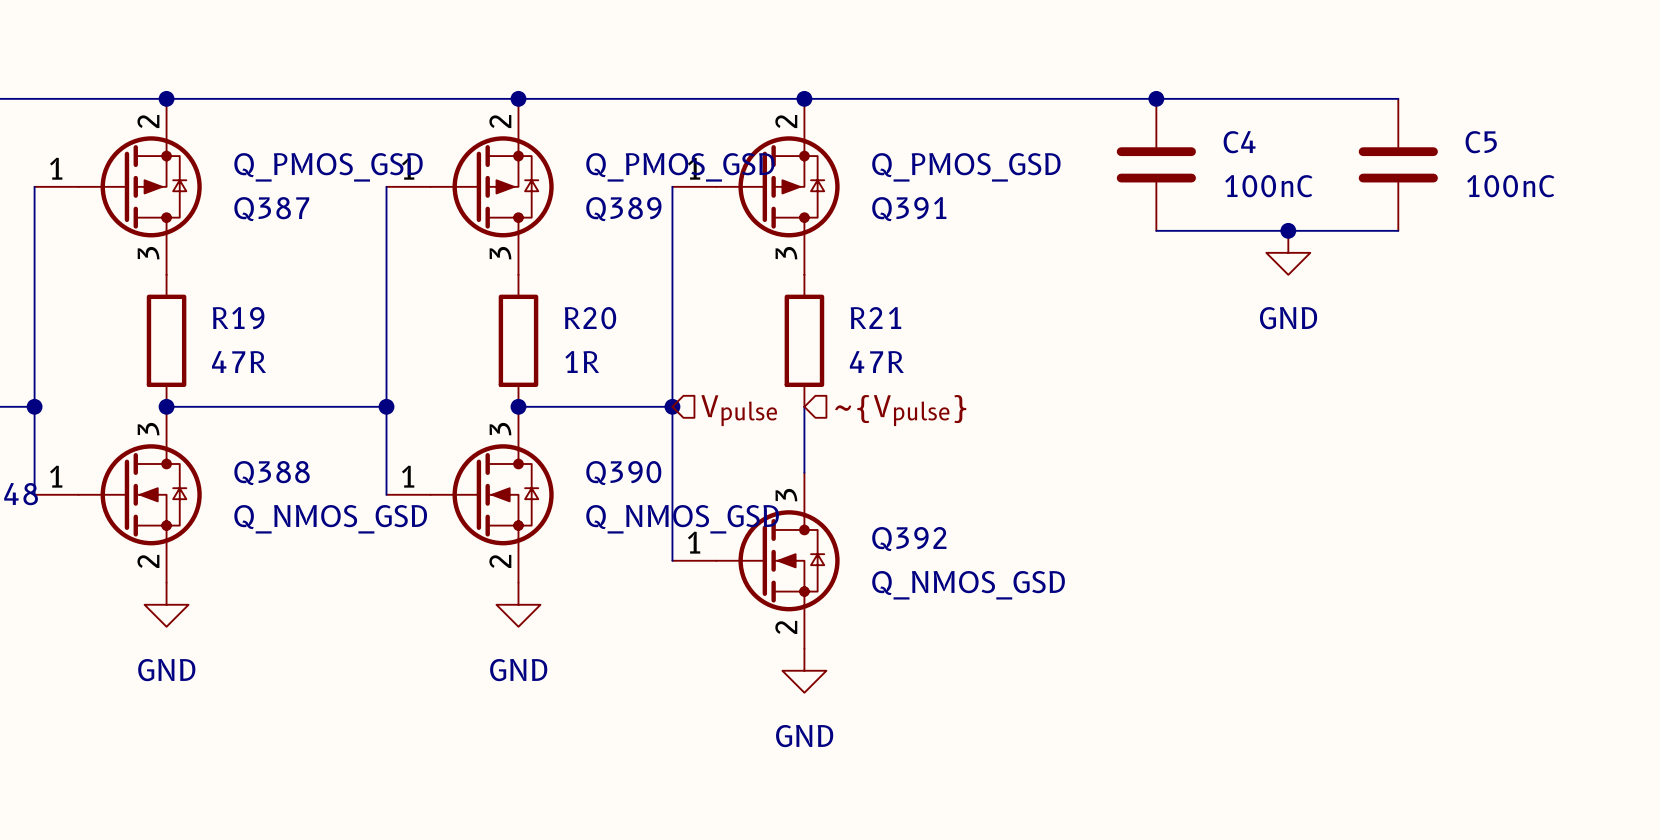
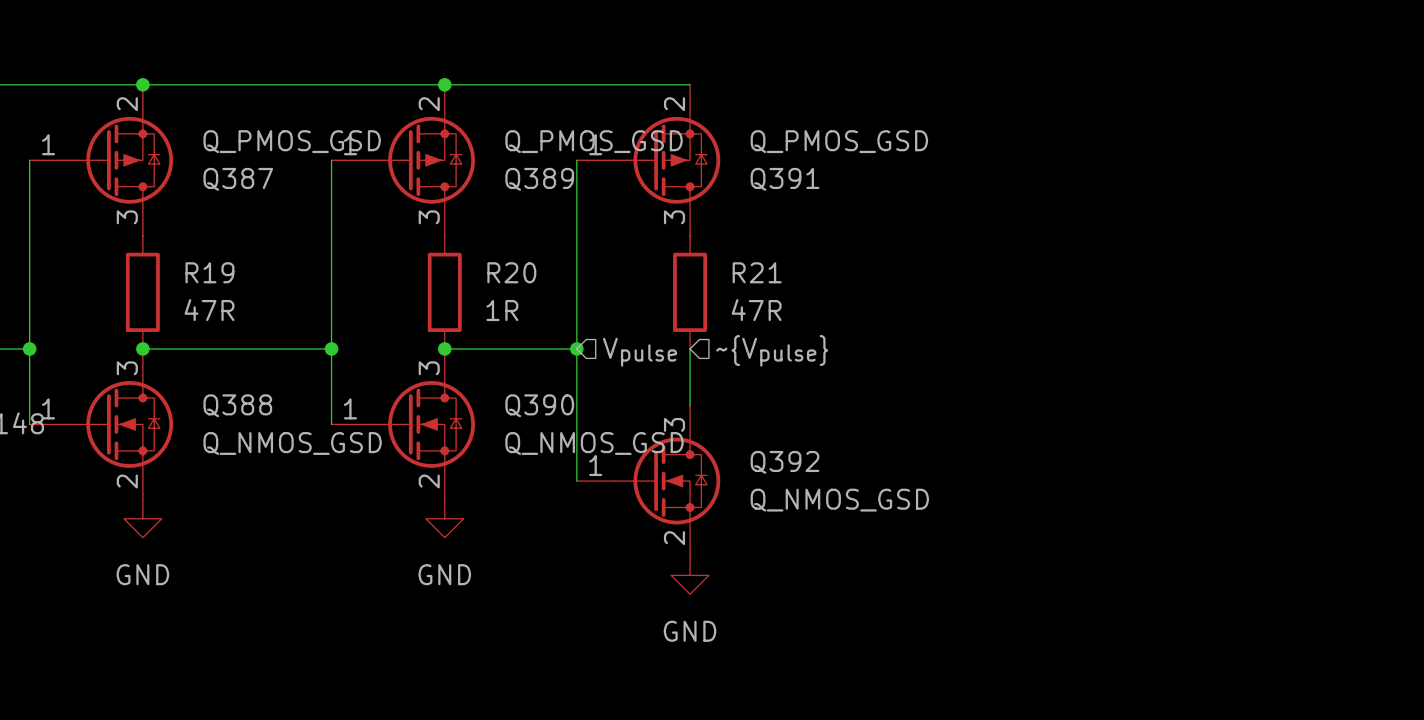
wire: (804, 98) (1398, 98) -> none
junction: (804, 98) -> none
junction: (1156, 98) -> none
C4: 100nC (1156, 164) -> none
C5: 100nC (1398, 164) -> none
wire: (1156, 230) (1398, 230) -> none
junction: (1288, 230) -> none
power symbol: GND (1288, 252) -> none

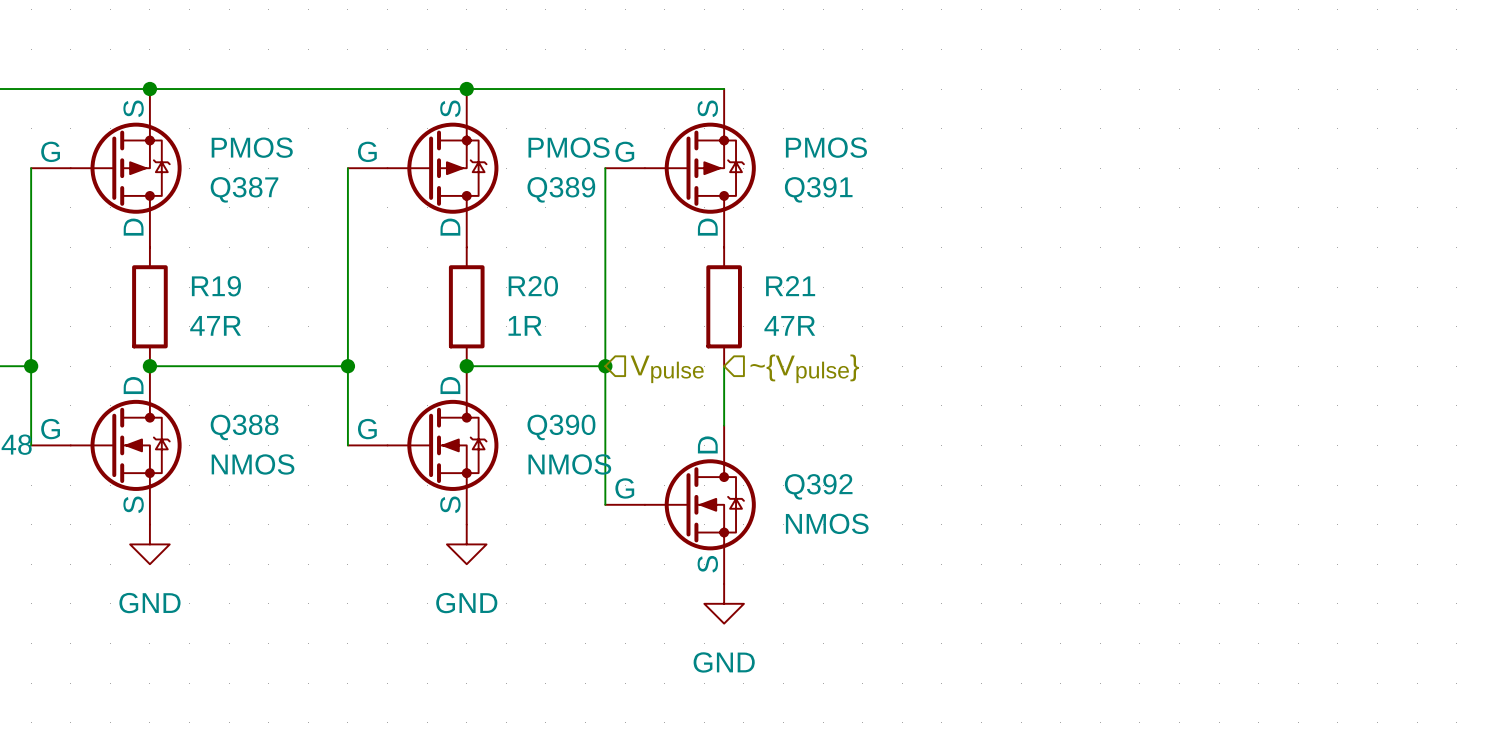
Q387 symbol: [29, 84, 174, 236] -> [31, 89, 182, 248]
Q389 symbol: [331, 84, 475, 236] -> [347, 89, 499, 248]
Q391 symbol: [576, 84, 721, 236] -> [605, 89, 756, 248]
Q387 value: Q_PMOS_GSD (292, 141) -> PMOS (252, 147)
Q389 value: Q_PMOS_GSD (594, 141) -> PMOS (569, 147)
Q391 value: Q_PMOS_GSD (839, 141) -> PMOS (826, 147)
Q388 symbol: [29, 348, 174, 500] -> [31, 366, 182, 525]
Q390 symbol: [331, 348, 475, 500] -> [347, 366, 499, 525]
Q392 symbol: [576, 405, 721, 557] -> [605, 425, 756, 585]
Q388 value: Q_NMOS_GSD (292, 443) -> NMOS (253, 464)
Q390 value: Q_NMOS_GSD (594, 443) -> NMOS (569, 464)
Q392 value: Q_NMOS_GSD (839, 500) -> NMOS (827, 523)

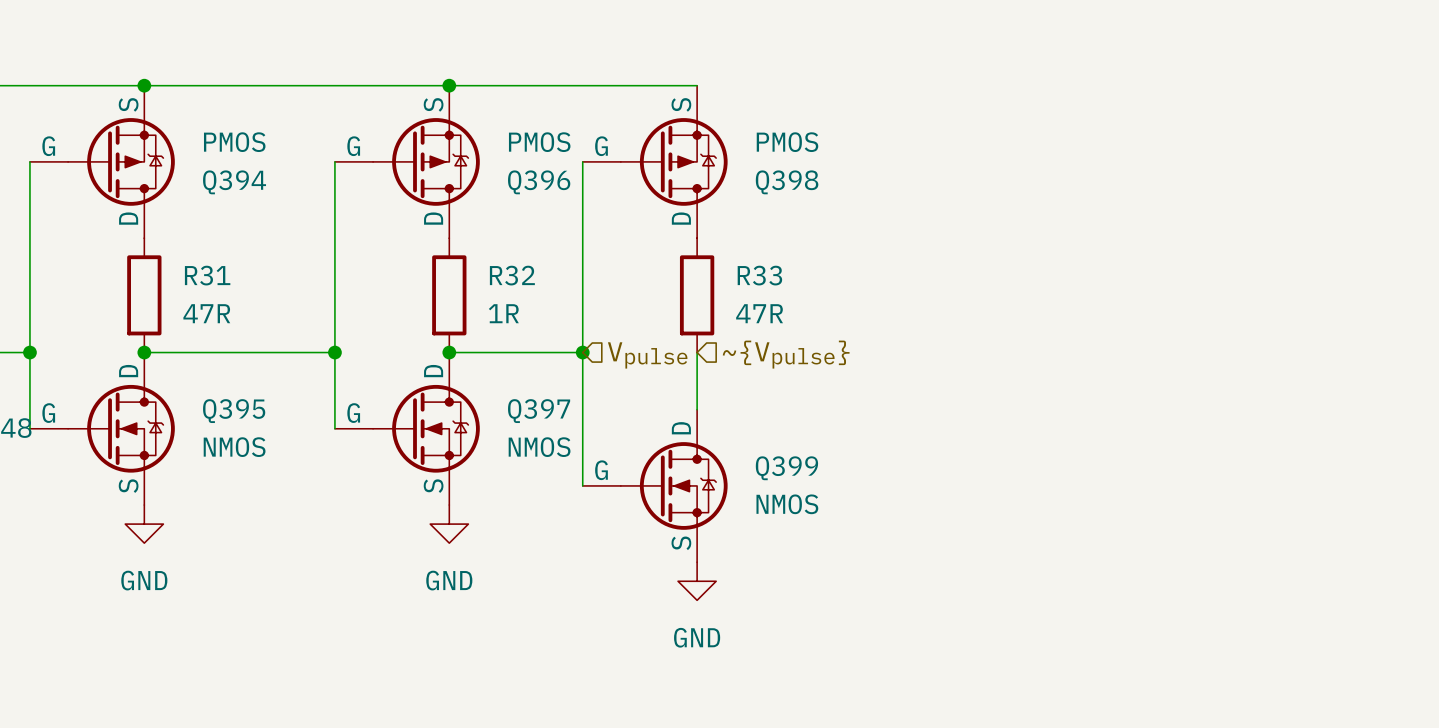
Q387 name: Q387 (244, 189) -> Q394 (234, 182)
Q389 name: Q389 (561, 189) -> Q396 (539, 182)
Q391 name: Q391 (818, 189) -> Q398 (787, 182)
R19 name: R19 (216, 286) -> R31 (207, 275)
R20 name: R20 (533, 286) -> R32 (512, 275)
R21 name: R21 (790, 286) -> R33 (759, 275)
Q388 name: Q388 (244, 427) -> Q395 (234, 411)
Q390 name: Q390 (561, 427) -> Q397 (539, 411)
Q392 name: Q392 (818, 486) -> Q399 (786, 468)

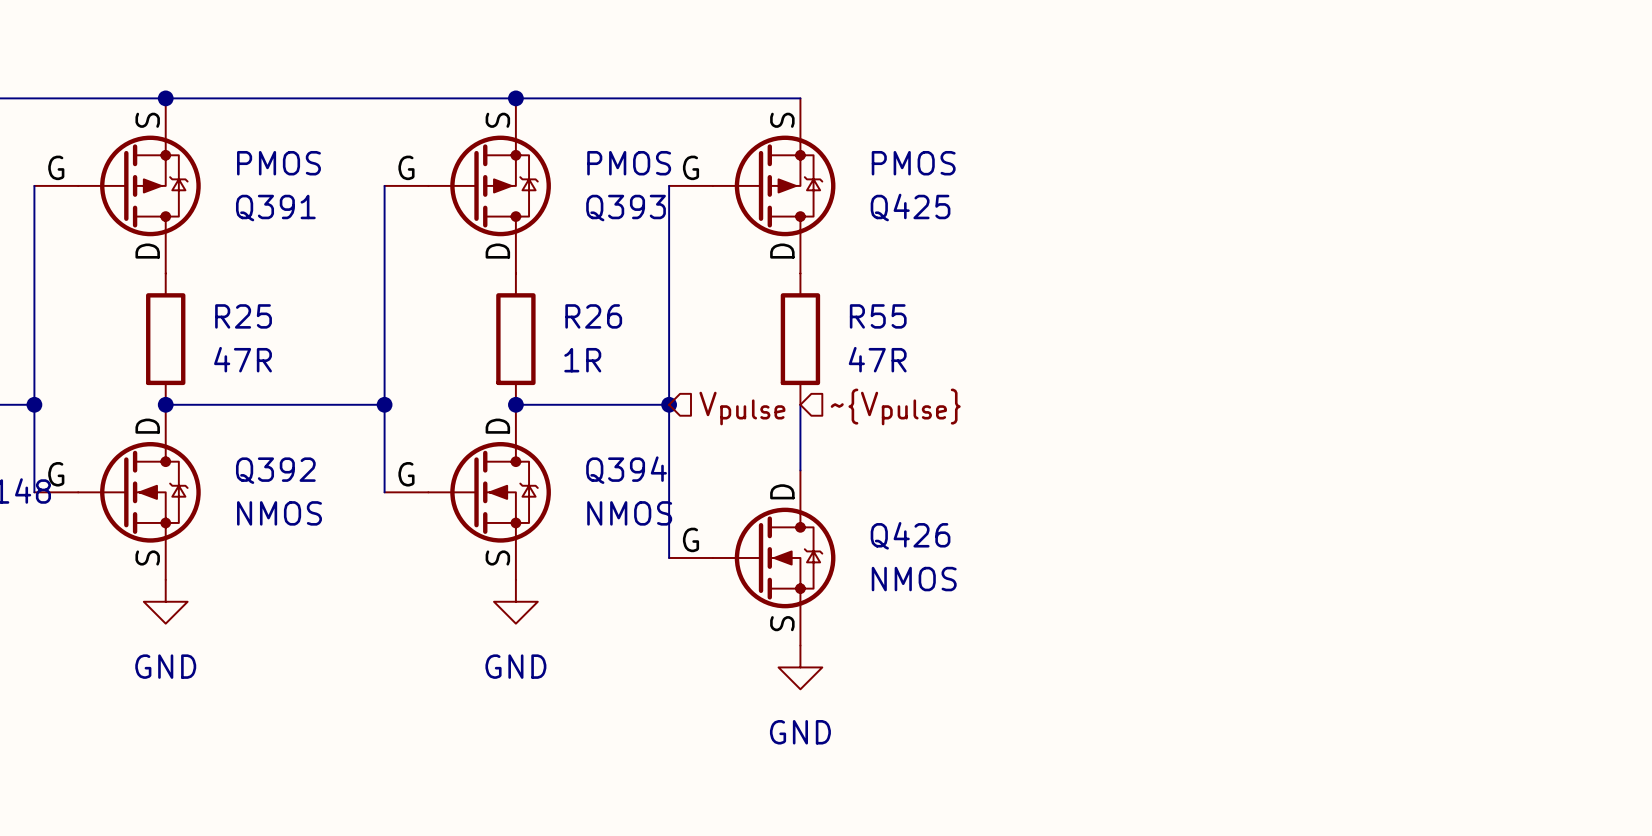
Q394 name: Q394 (234, 182) -> Q391 (275, 208)
Q396 name: Q396 (539, 182) -> Q393 (626, 208)
Q398 name: Q398 (787, 182) -> Q425 (910, 207)
R31 name: R31 (207, 275) -> R25 (243, 316)
R32 name: R32 (512, 275) -> R26 (593, 316)
R33 name: R33 (759, 275) -> R55 (878, 316)
Q395 name: Q395 (234, 411) -> Q392 (275, 470)
Q397 name: Q397 (539, 411) -> Q394 (626, 470)
Q399 name: Q399 (786, 468) -> Q426 (910, 535)

